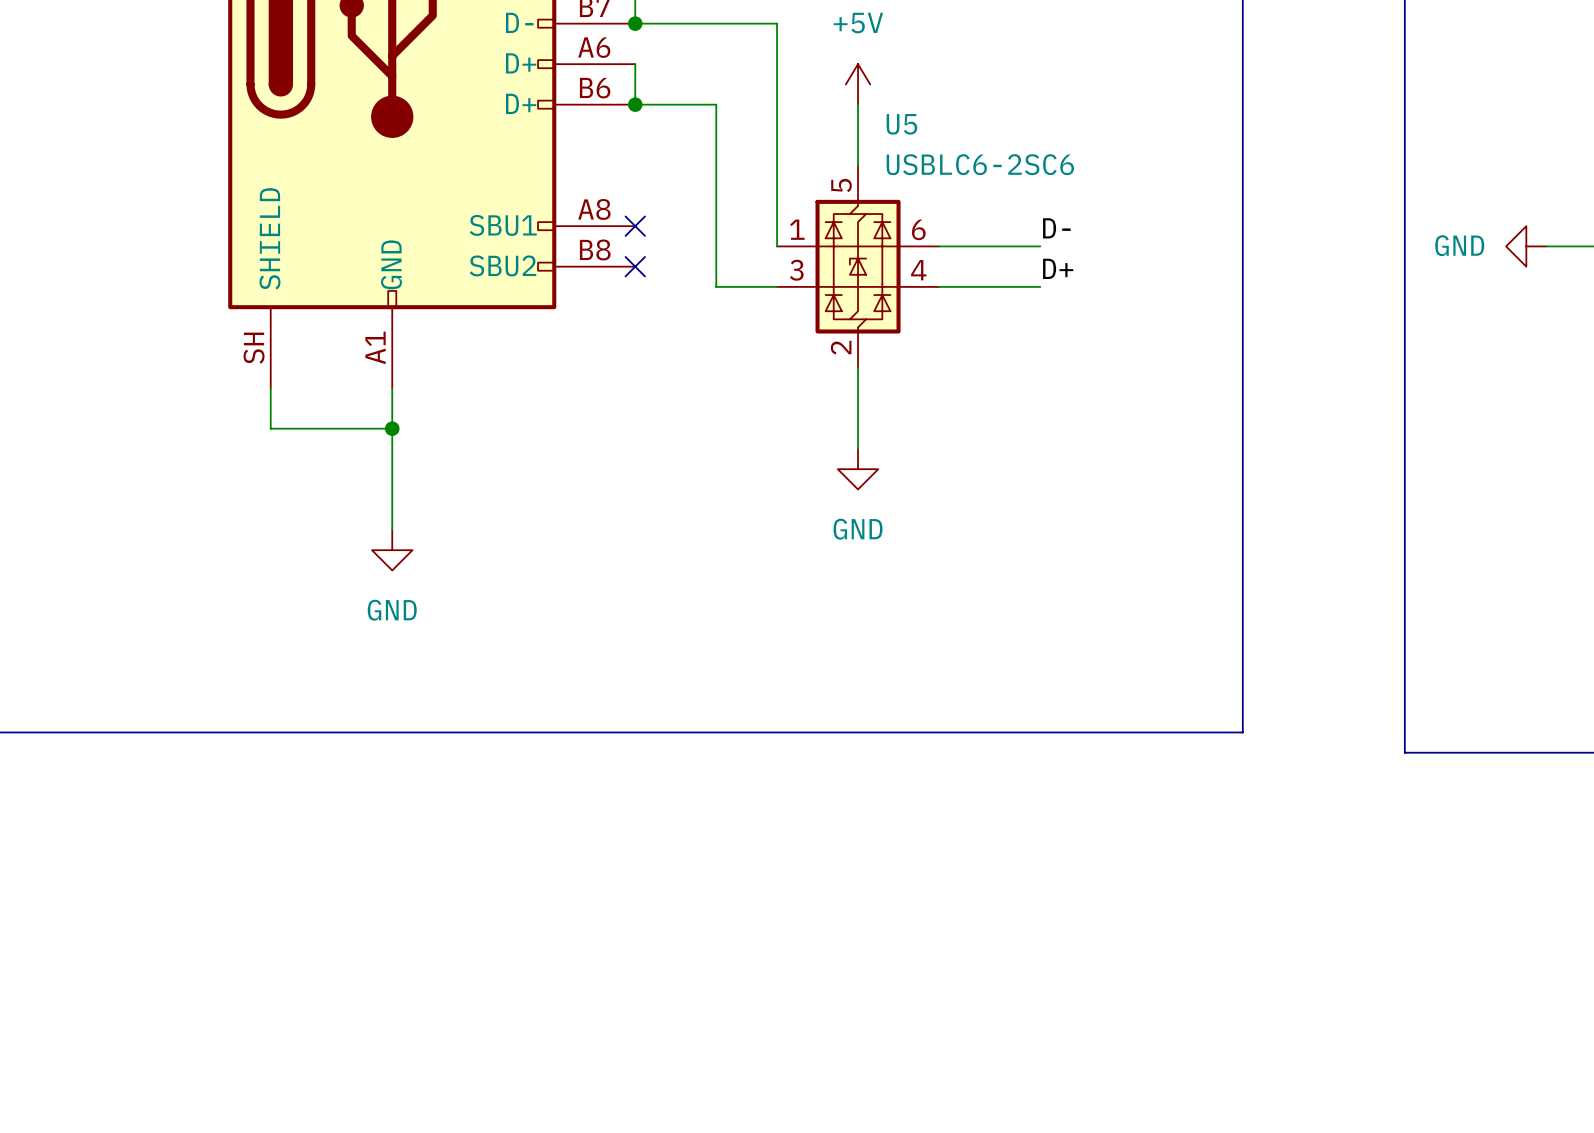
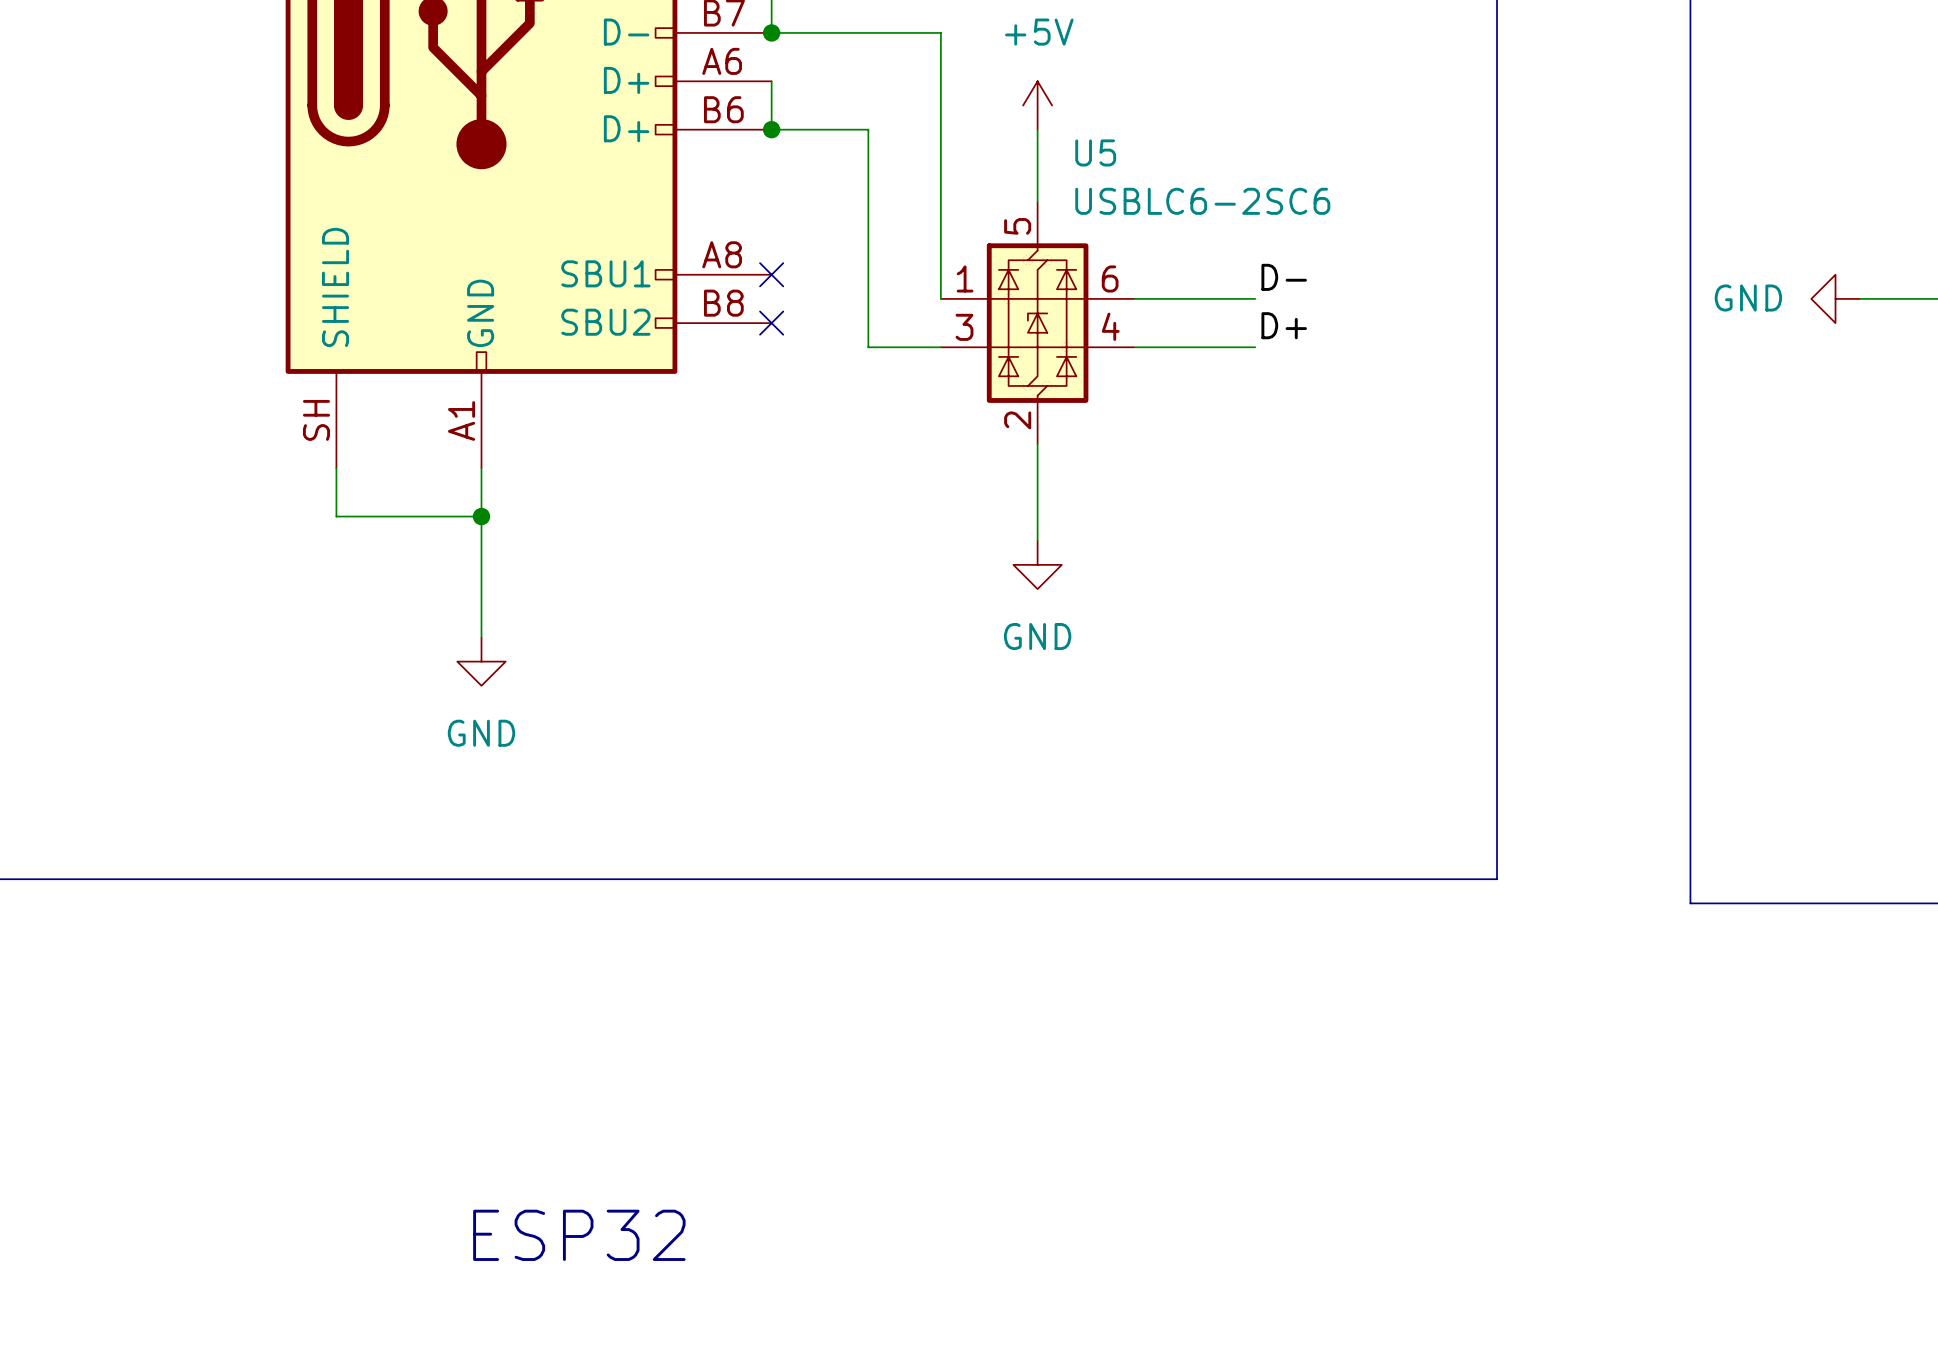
text: none -> ESP32 (579, 1235)

